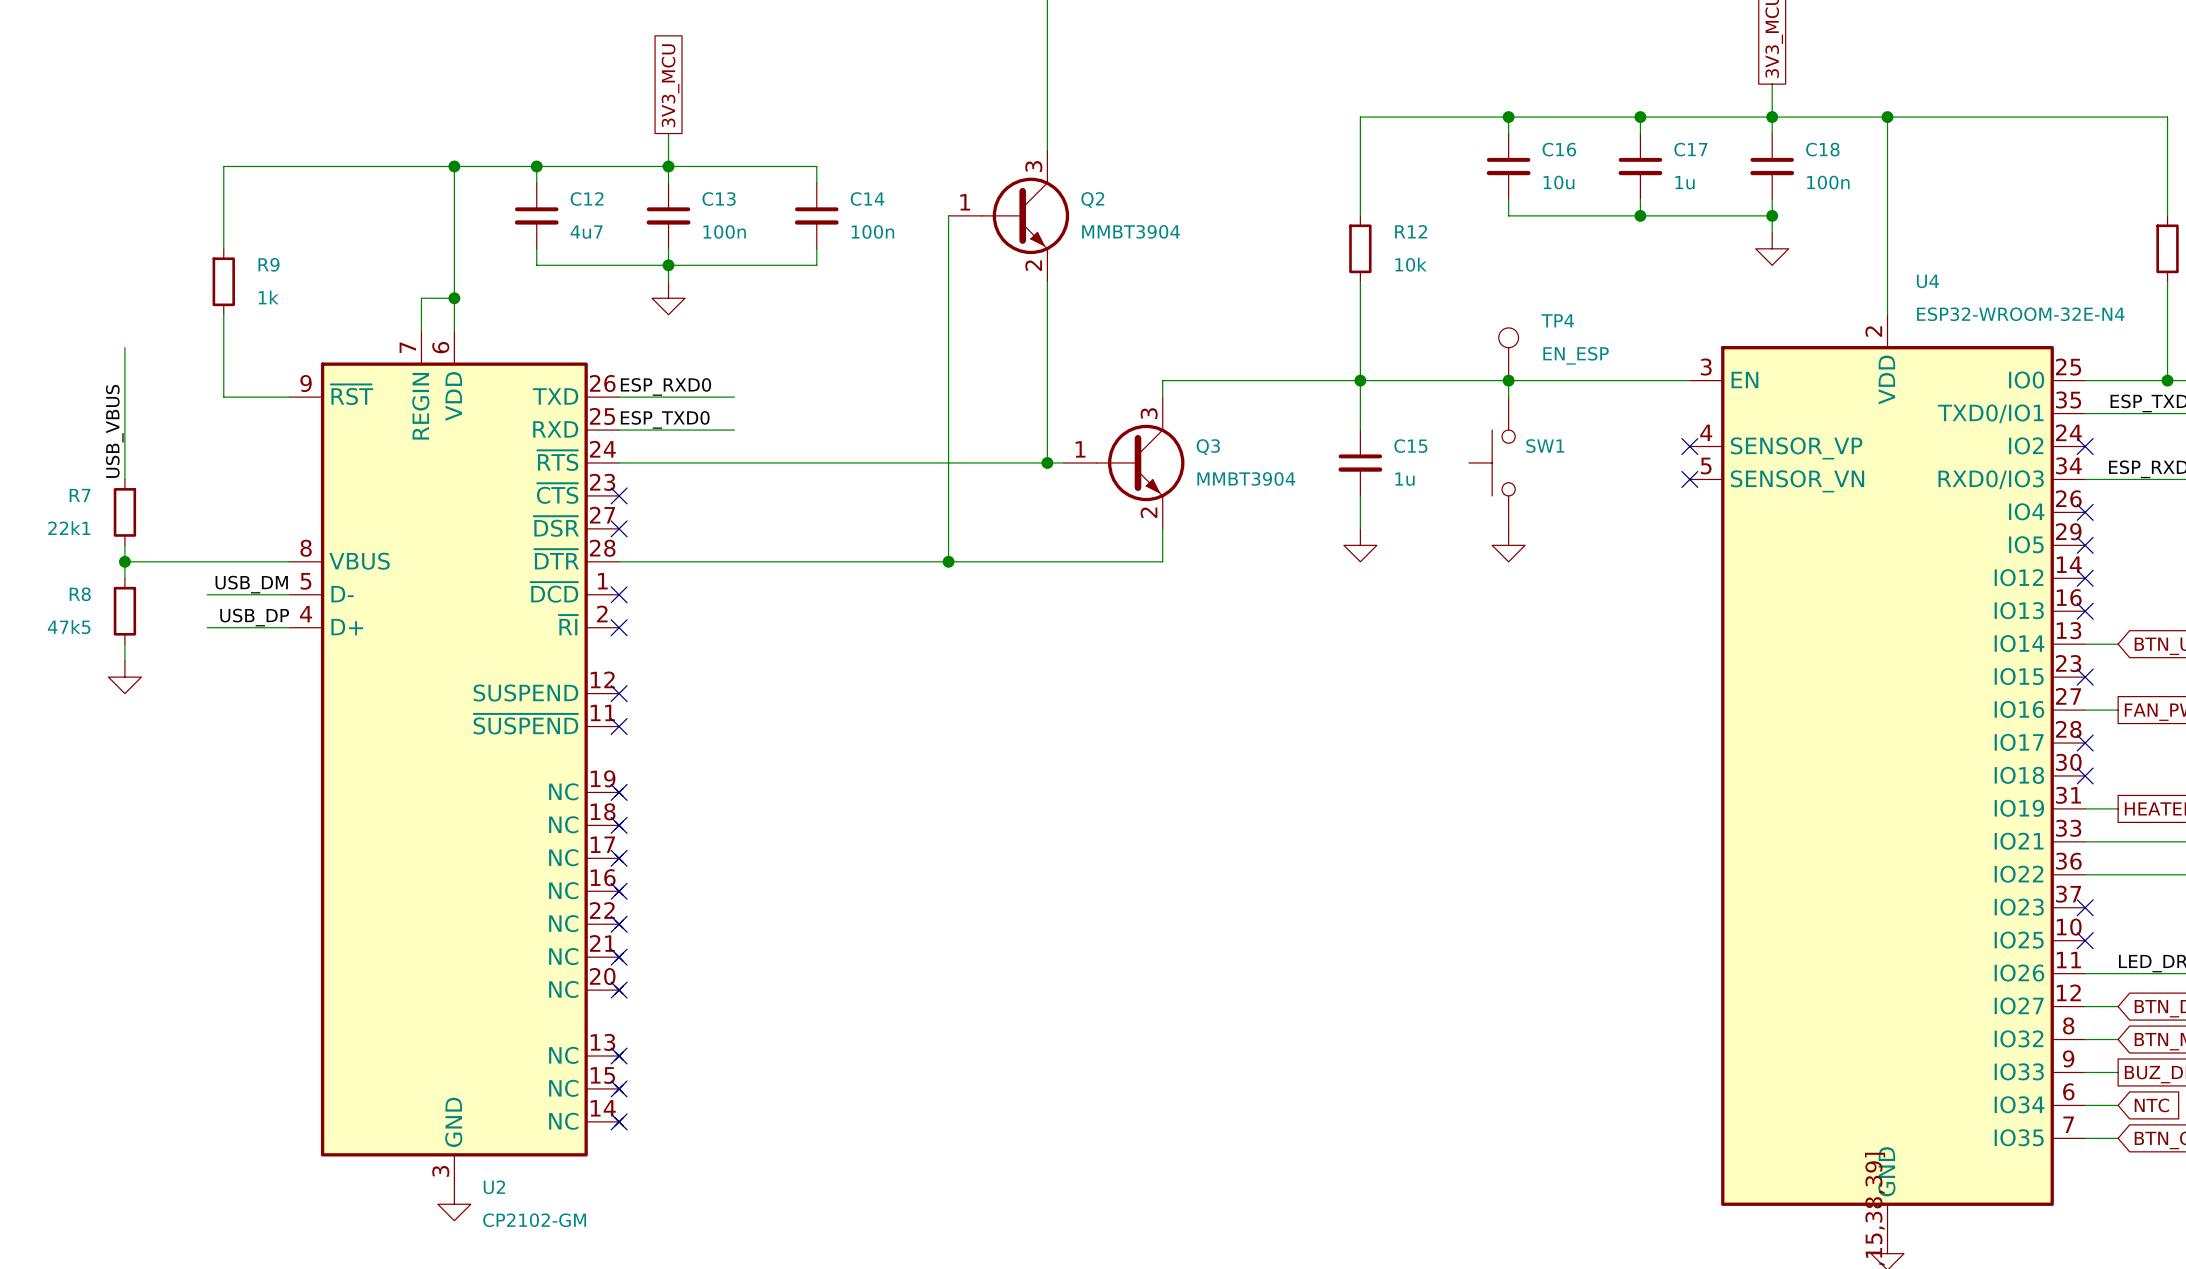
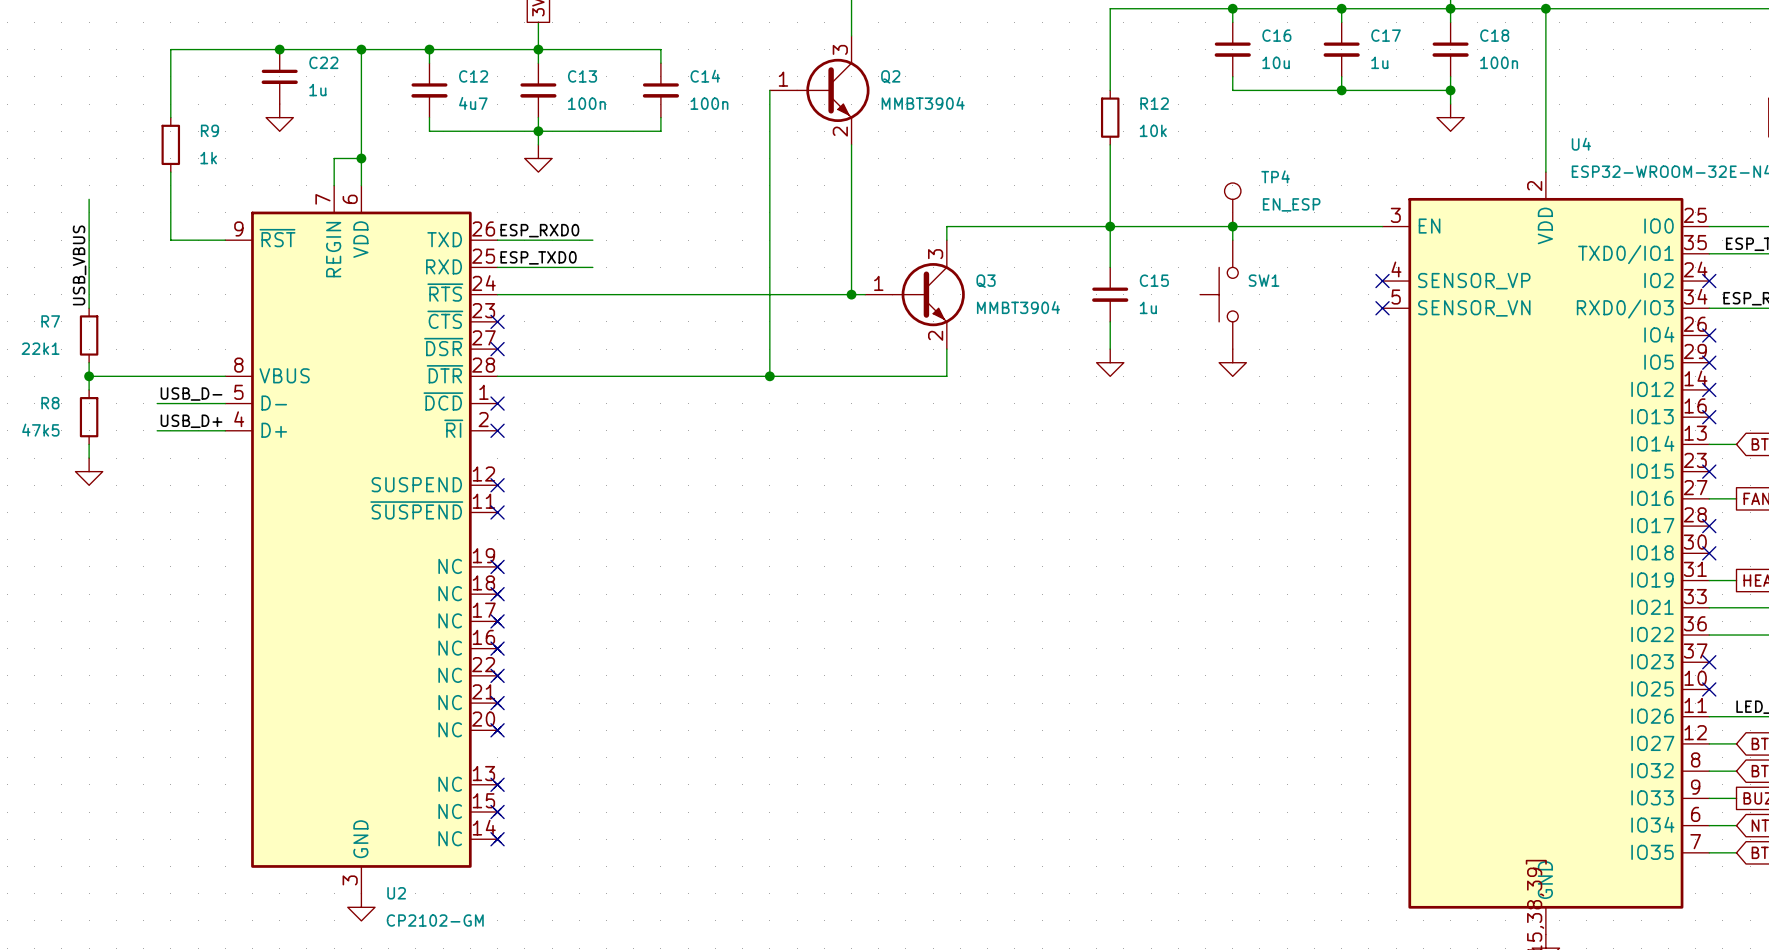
junction: none -> (279, 49)
C22: none -> 1u (279, 76)
power symbol: none -> (279, 117)
label: USB_DM (251, 584) -> USB_D- (191, 394)
label: USB_DP (254, 617) -> USB_D+ (191, 421)

